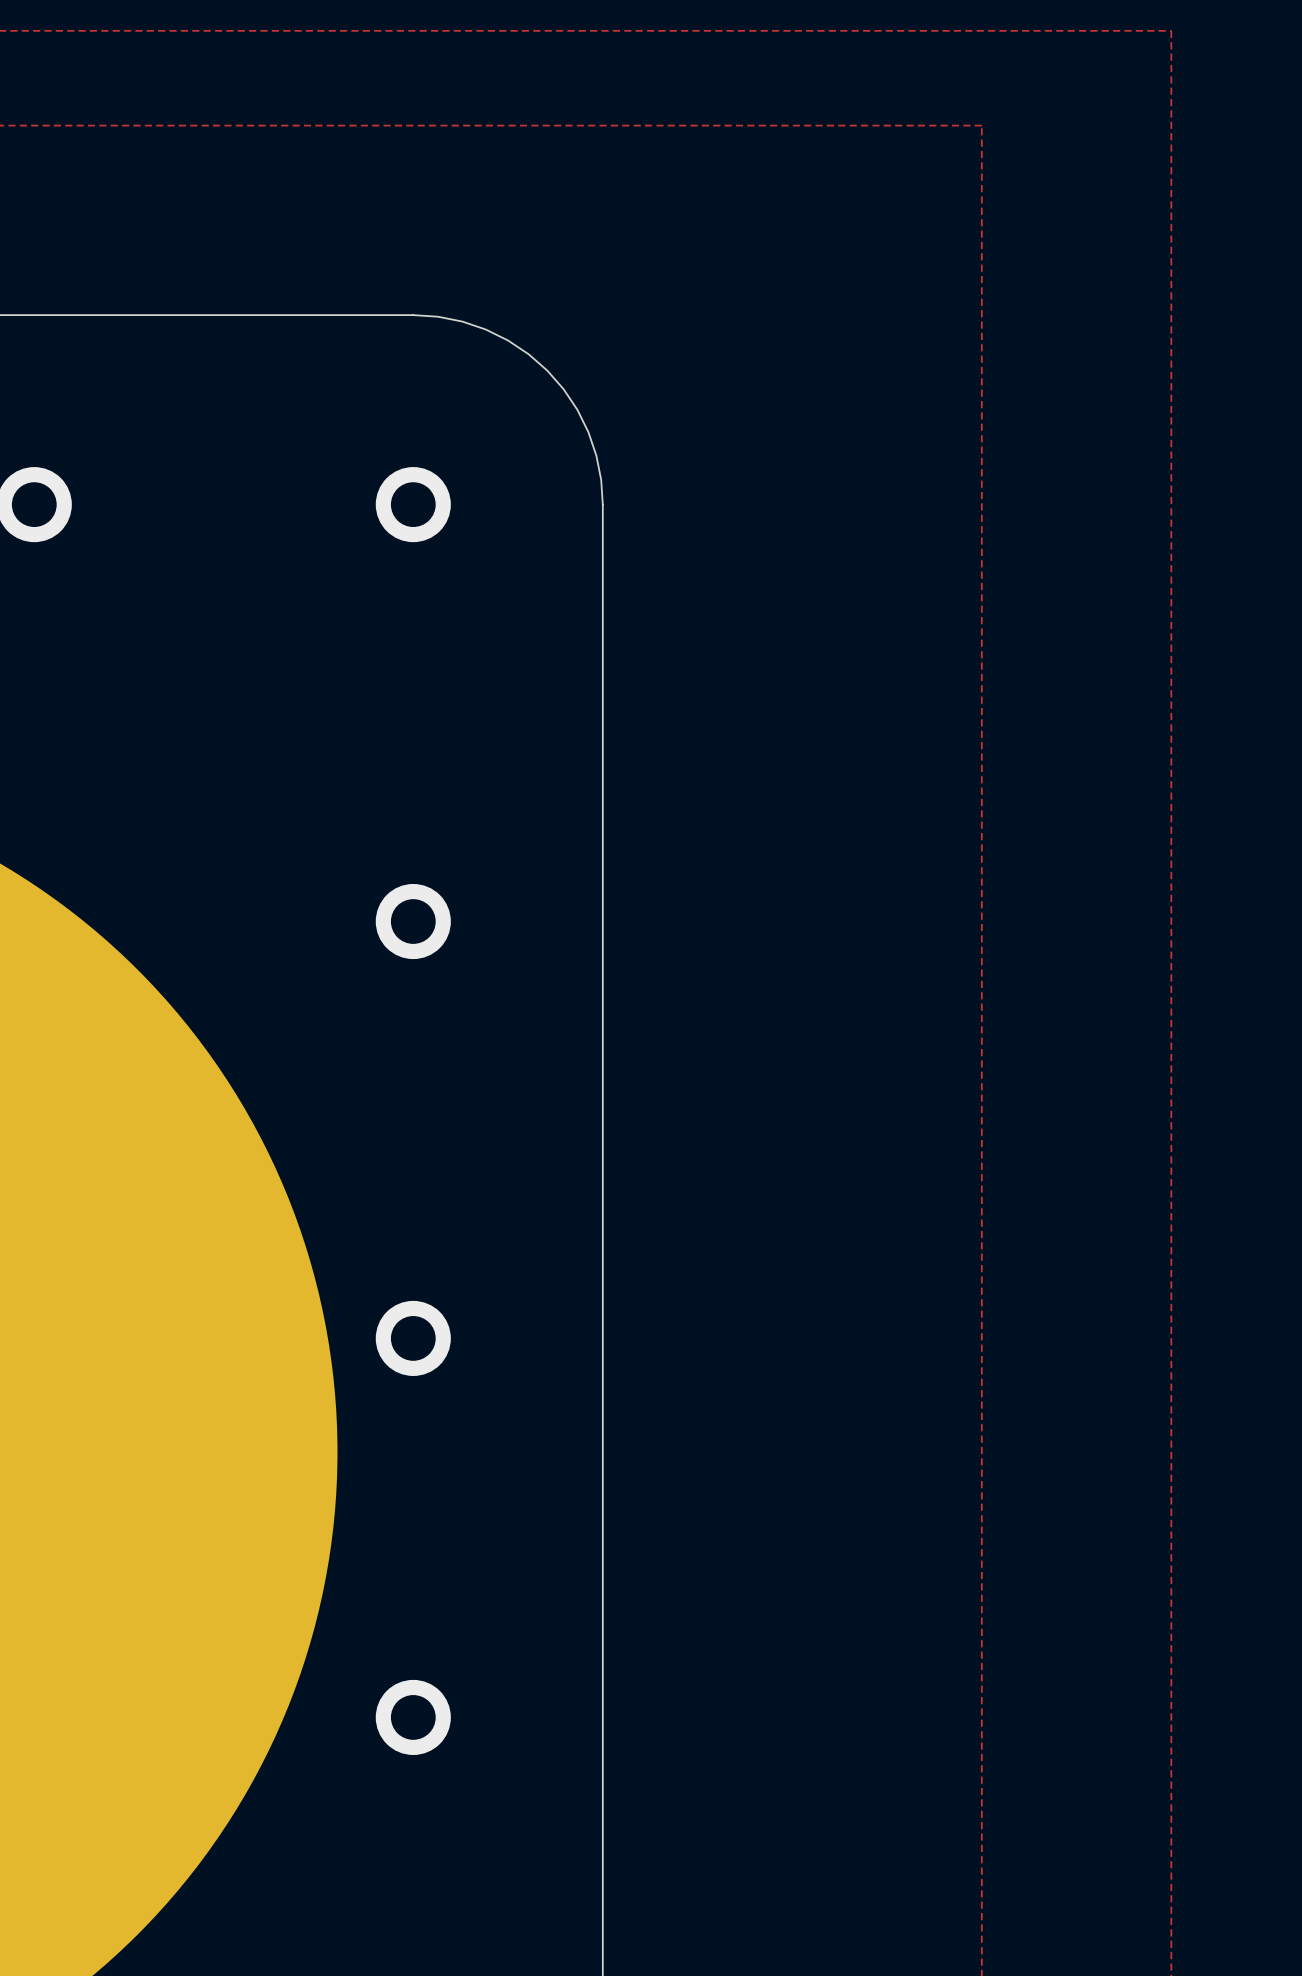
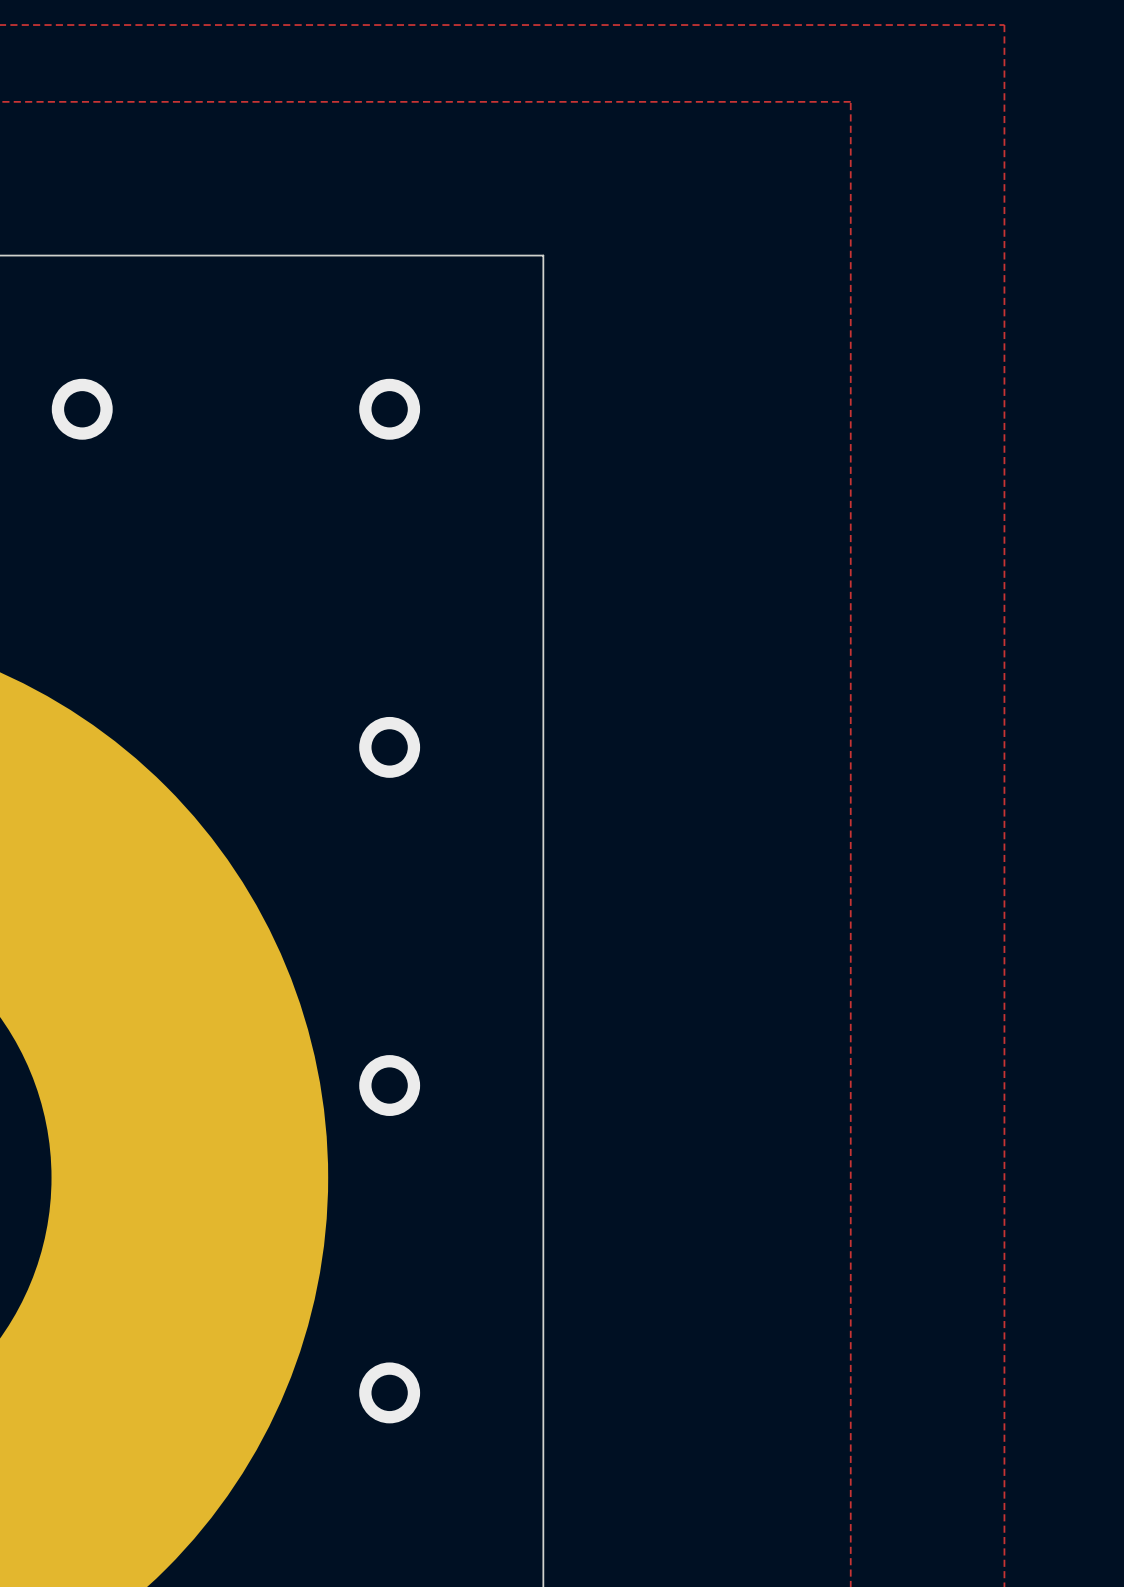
board edge: (413, 315) (438, 316) (462, 321) (485, 329) (508, 340) (528, 354) (547, 370) (563, 389) (577, 409) (588, 432) (596, 455) (601, 479) (602, 504) -> (389, 255) (543, 255) (543, 409)

